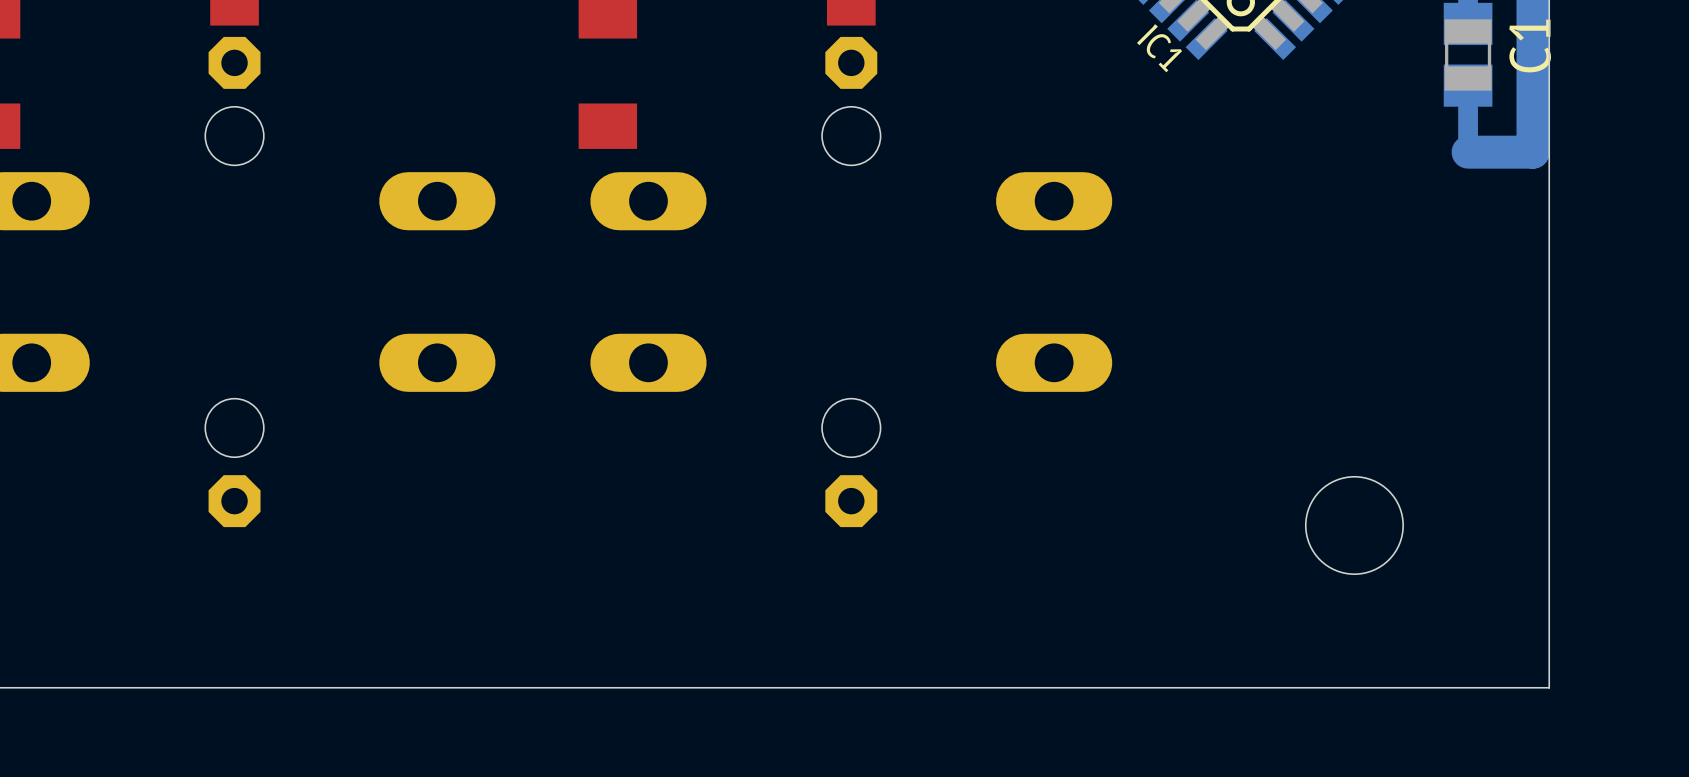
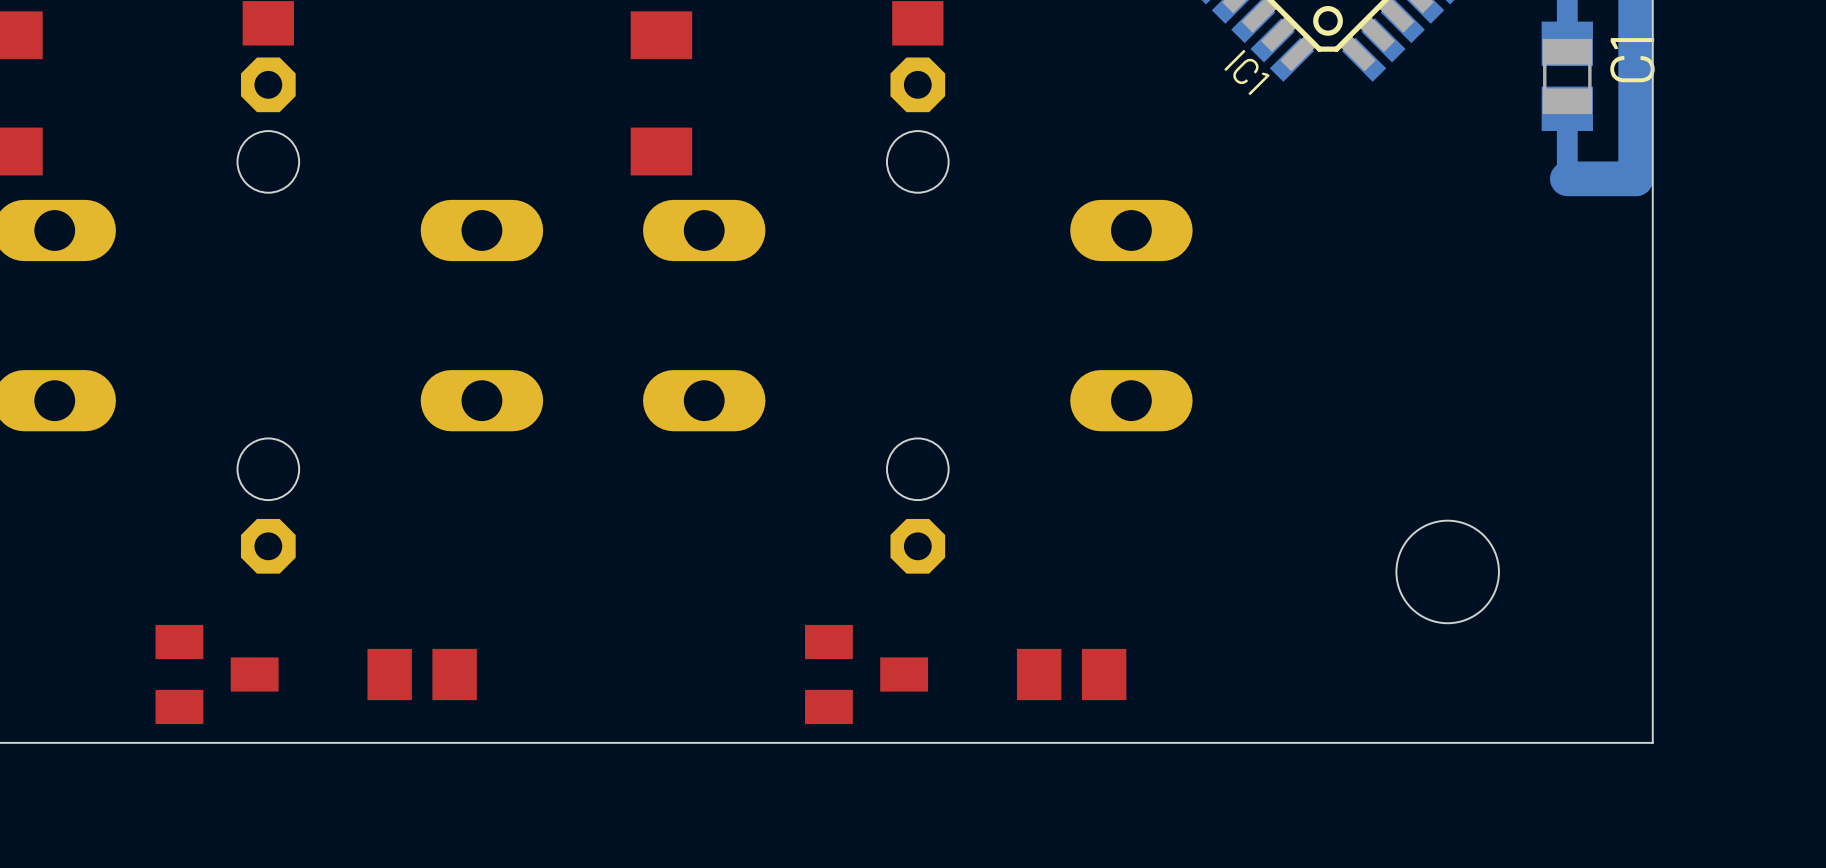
part: none -> (217, 674)
part: none -> (422, 674)
part: none -> (866, 674)
part: none -> (1071, 674)

